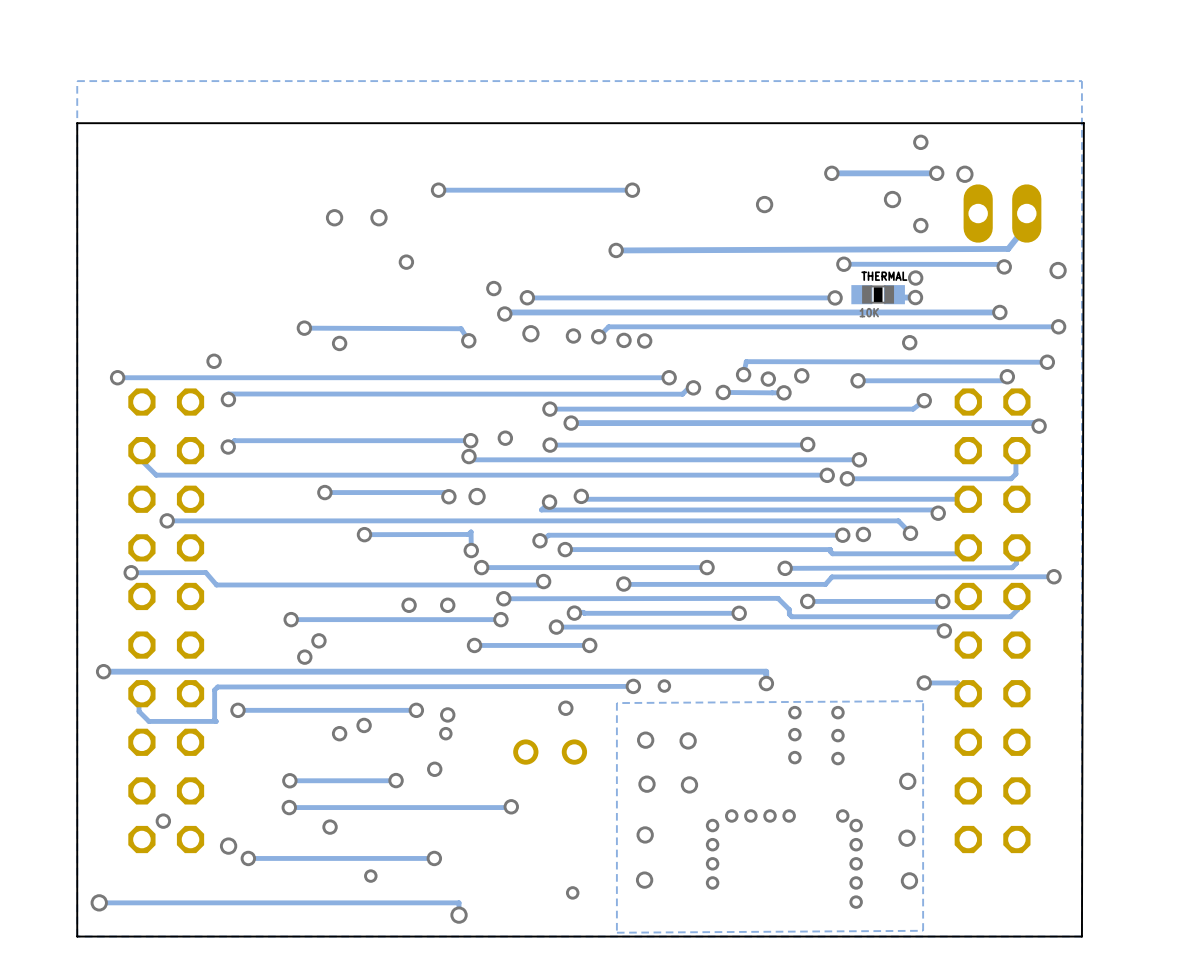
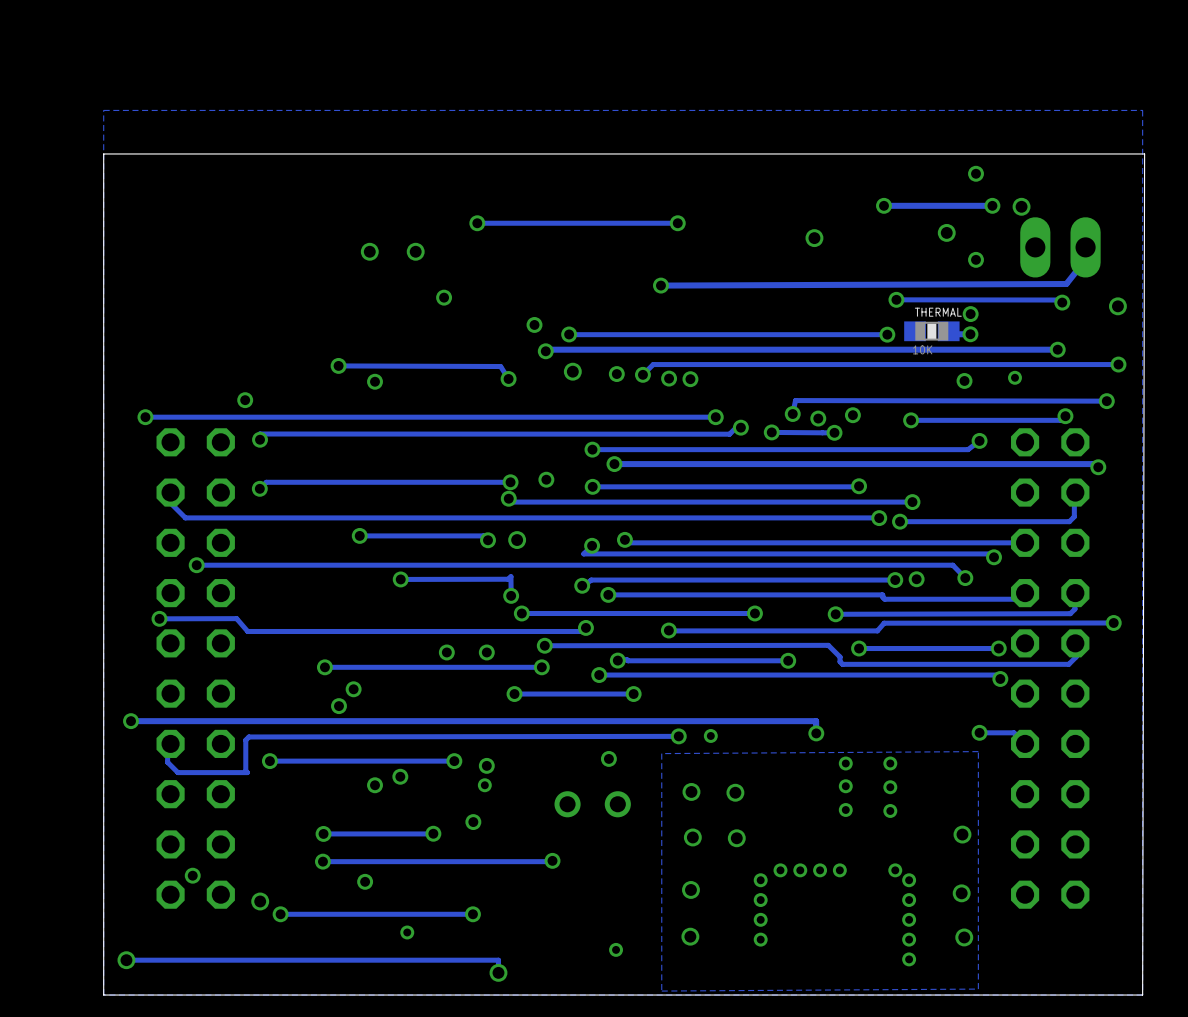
via: none -> (1014, 377)

